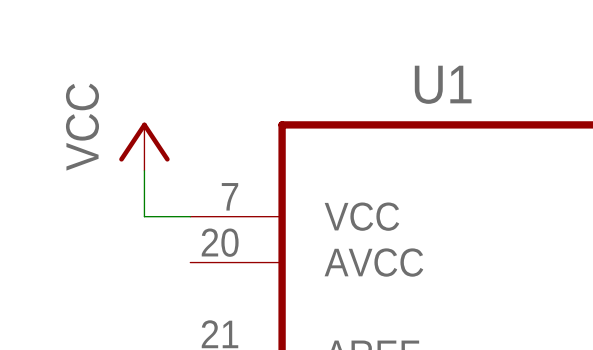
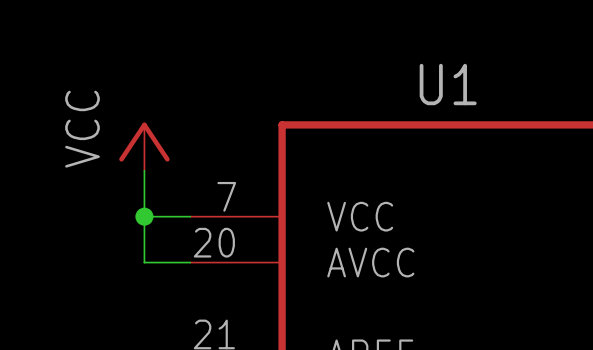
wire: none -> (144, 216) (144, 262) (190, 262)
junction: none -> (144, 216)

